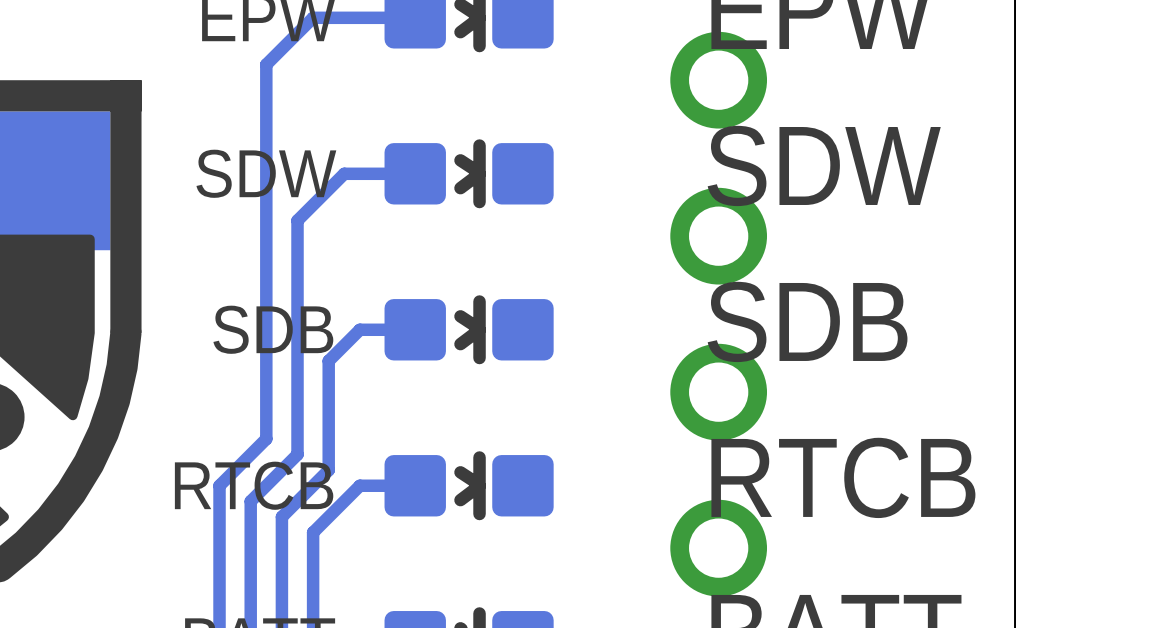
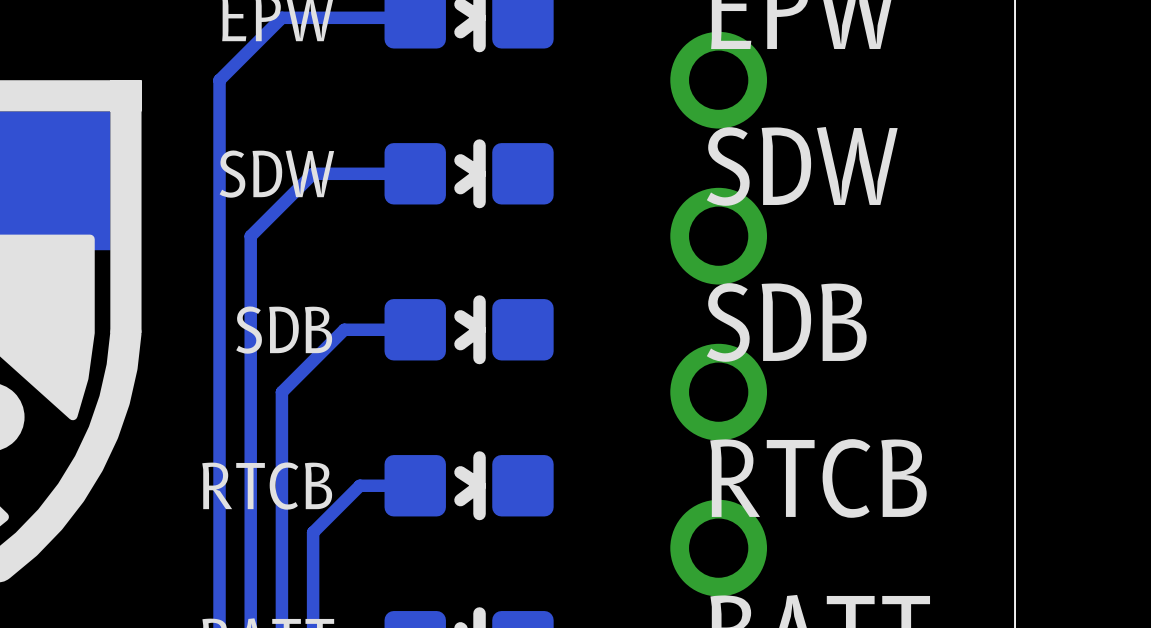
track: (313, 17) (266, 64) (266, 438) (219, 485) -> (313, 17) (281, 17) (219, 80) (219, 485)
track: (344, 173) (297, 220) (297, 454) (250, 501) -> (344, 173) (313, 173) (250, 236) (250, 501)
track: (359, 329) (328, 360) (328, 470) (281, 516) -> (359, 329) (344, 329) (281, 392) (281, 516)

